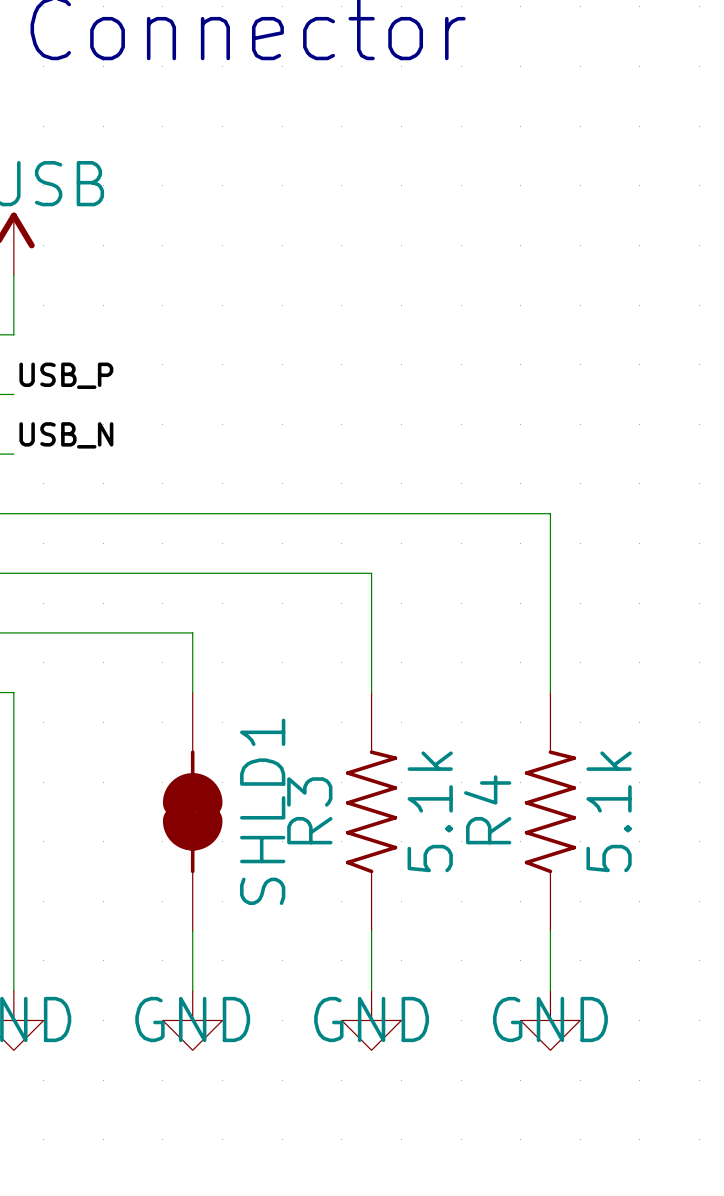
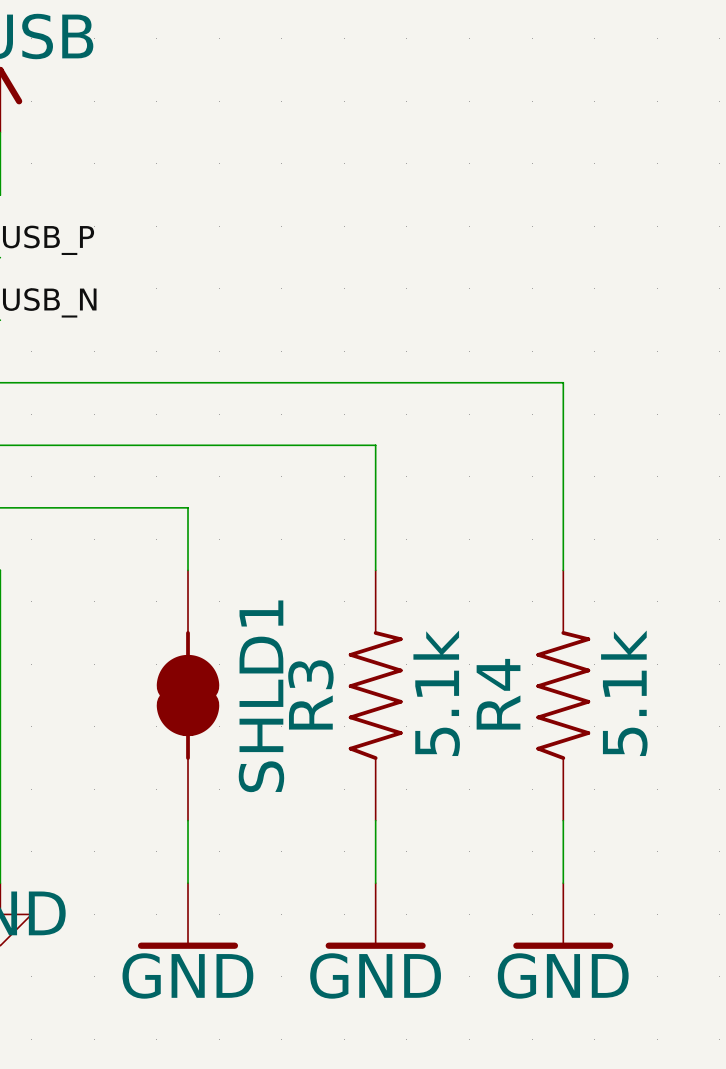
power symbol shape: [162, 990, 223, 1051] -> [137, 883, 239, 949]
power symbol shape: [341, 990, 402, 1051] -> [325, 883, 426, 949]
power symbol shape: [520, 990, 581, 1051] -> [513, 883, 614, 949]
power symbol text position: GND (192, 1019) -> GND (187, 975)
power symbol text position: GND (371, 1019) -> GND (375, 975)
power symbol text position: GND (550, 1019) -> GND (563, 975)

